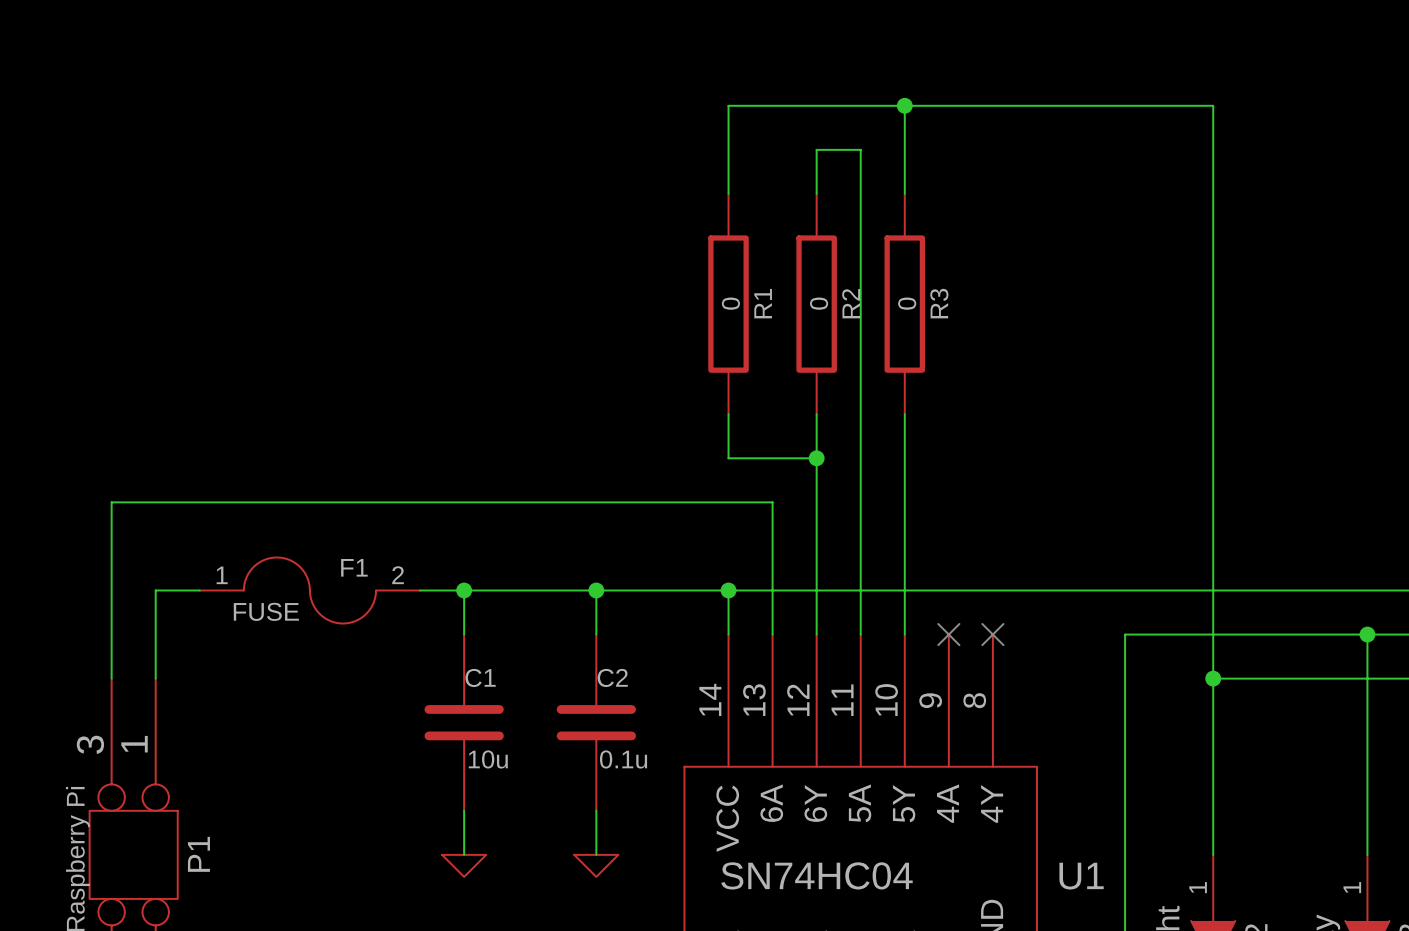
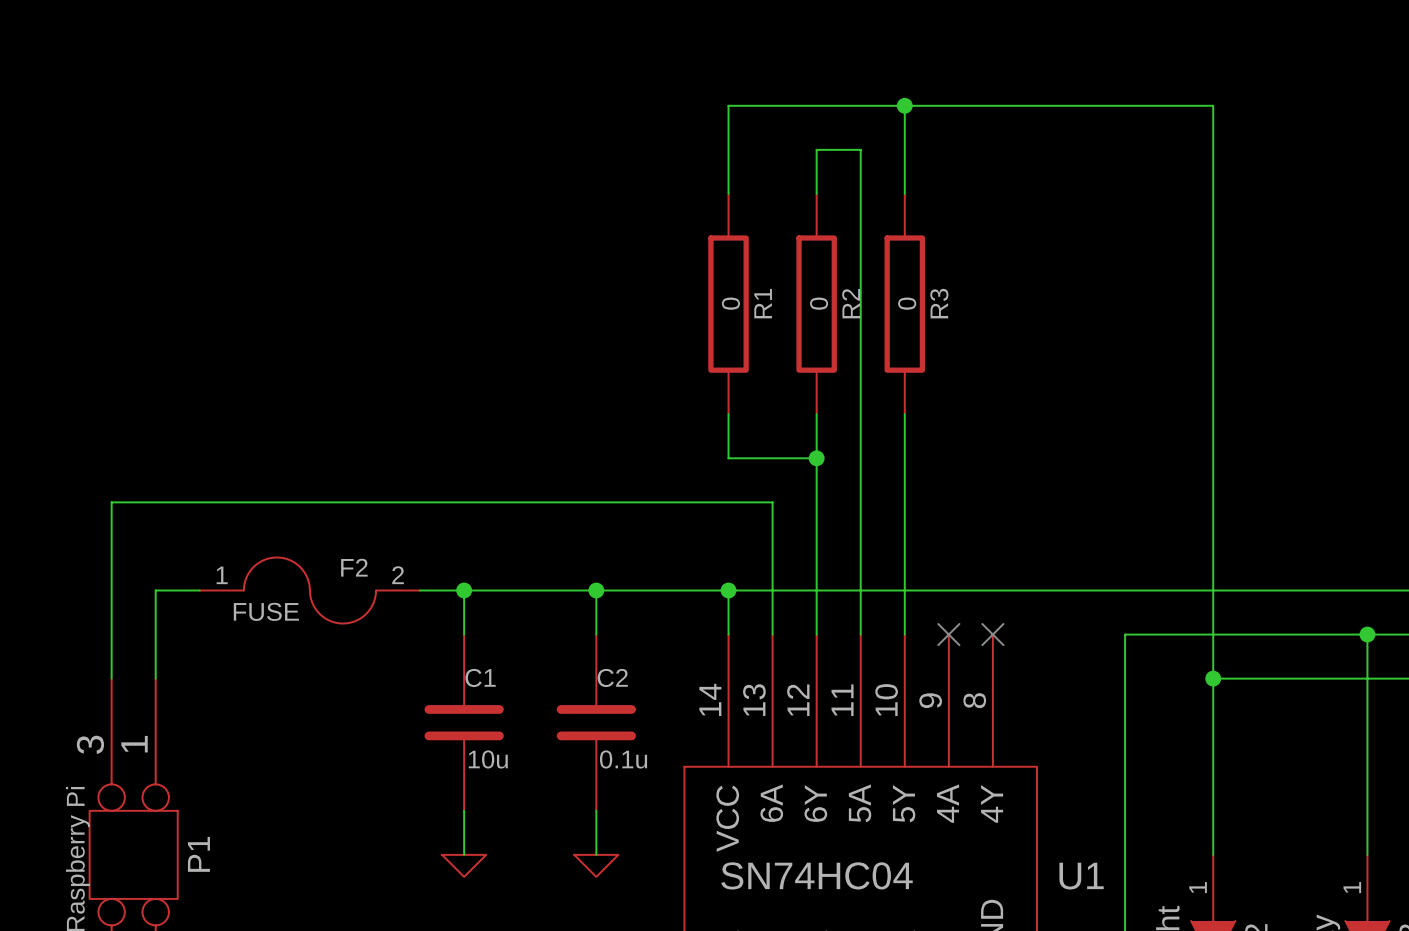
F1 name: F1 (354, 567) -> F2 (354, 567)

